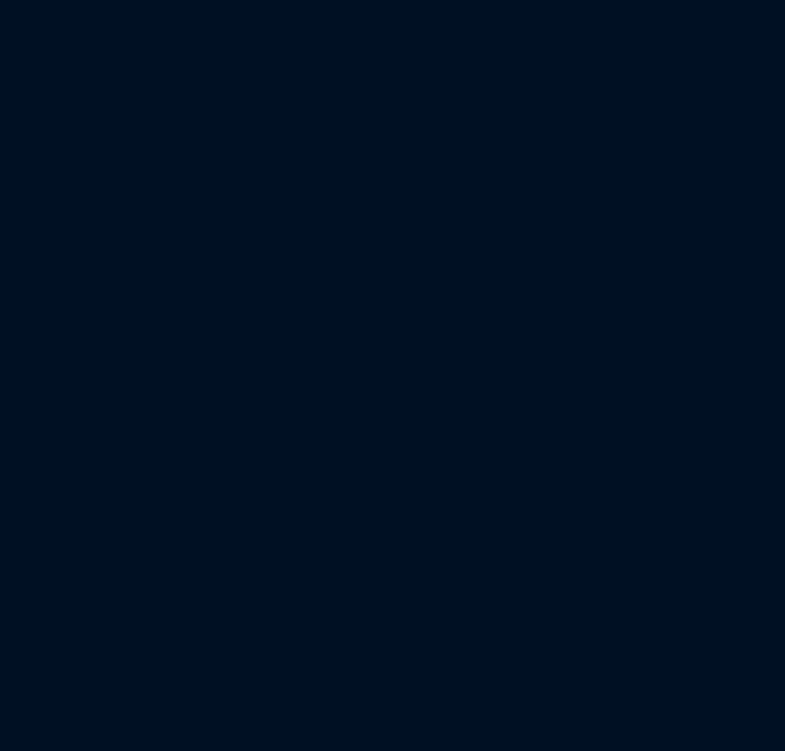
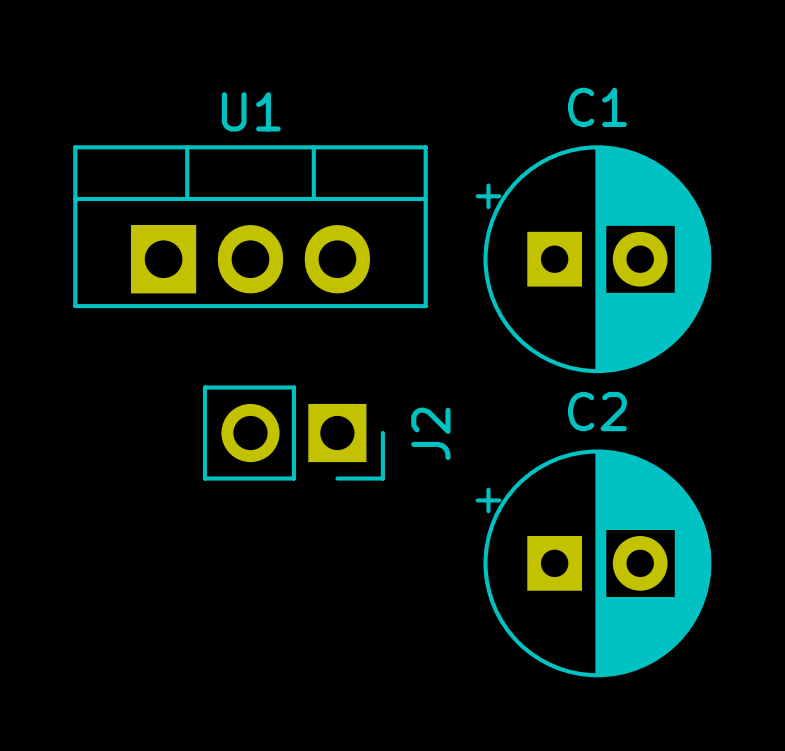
U1: none -> (250, 226)
C1: none -> (593, 259)
J2: none -> (293, 433)
C2: none -> (593, 563)

